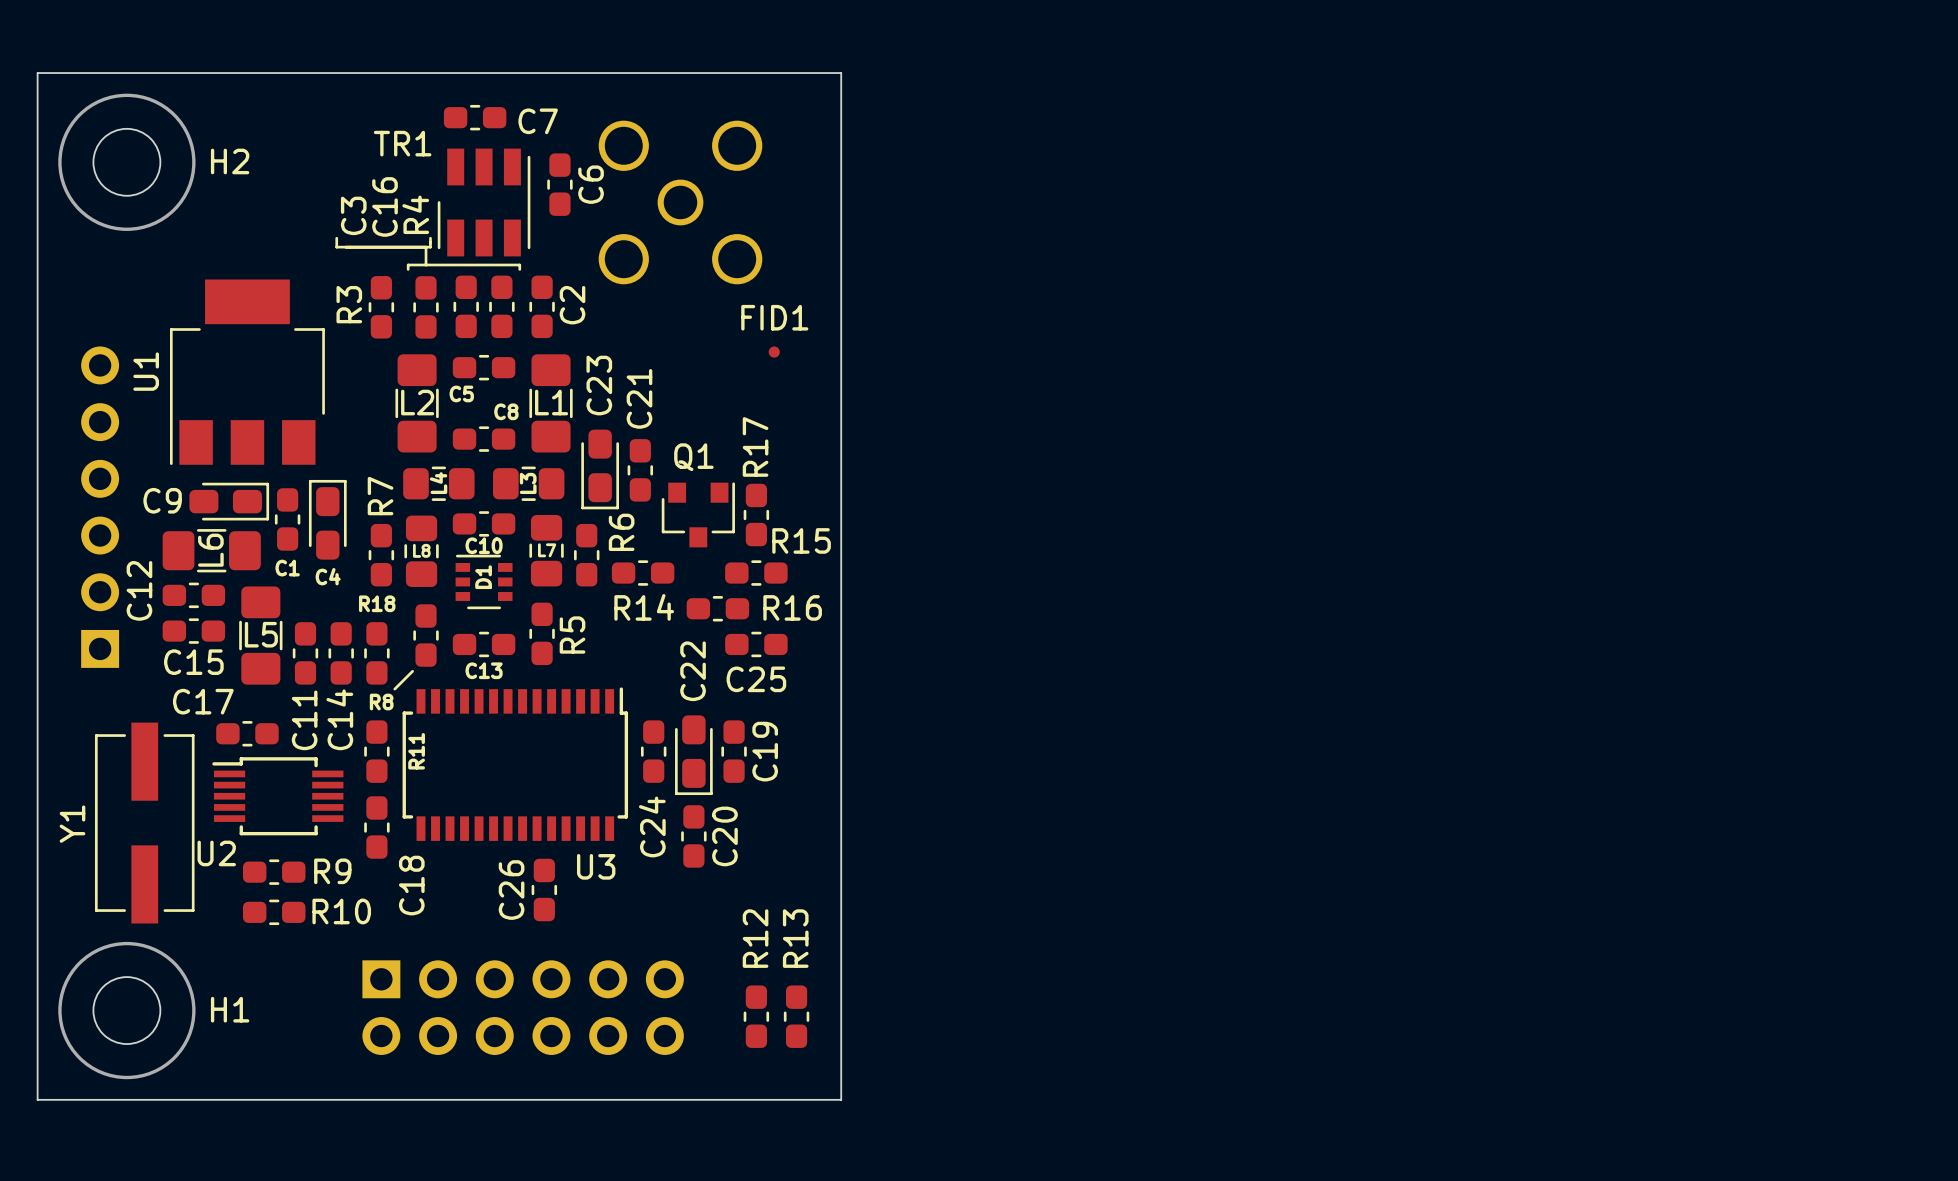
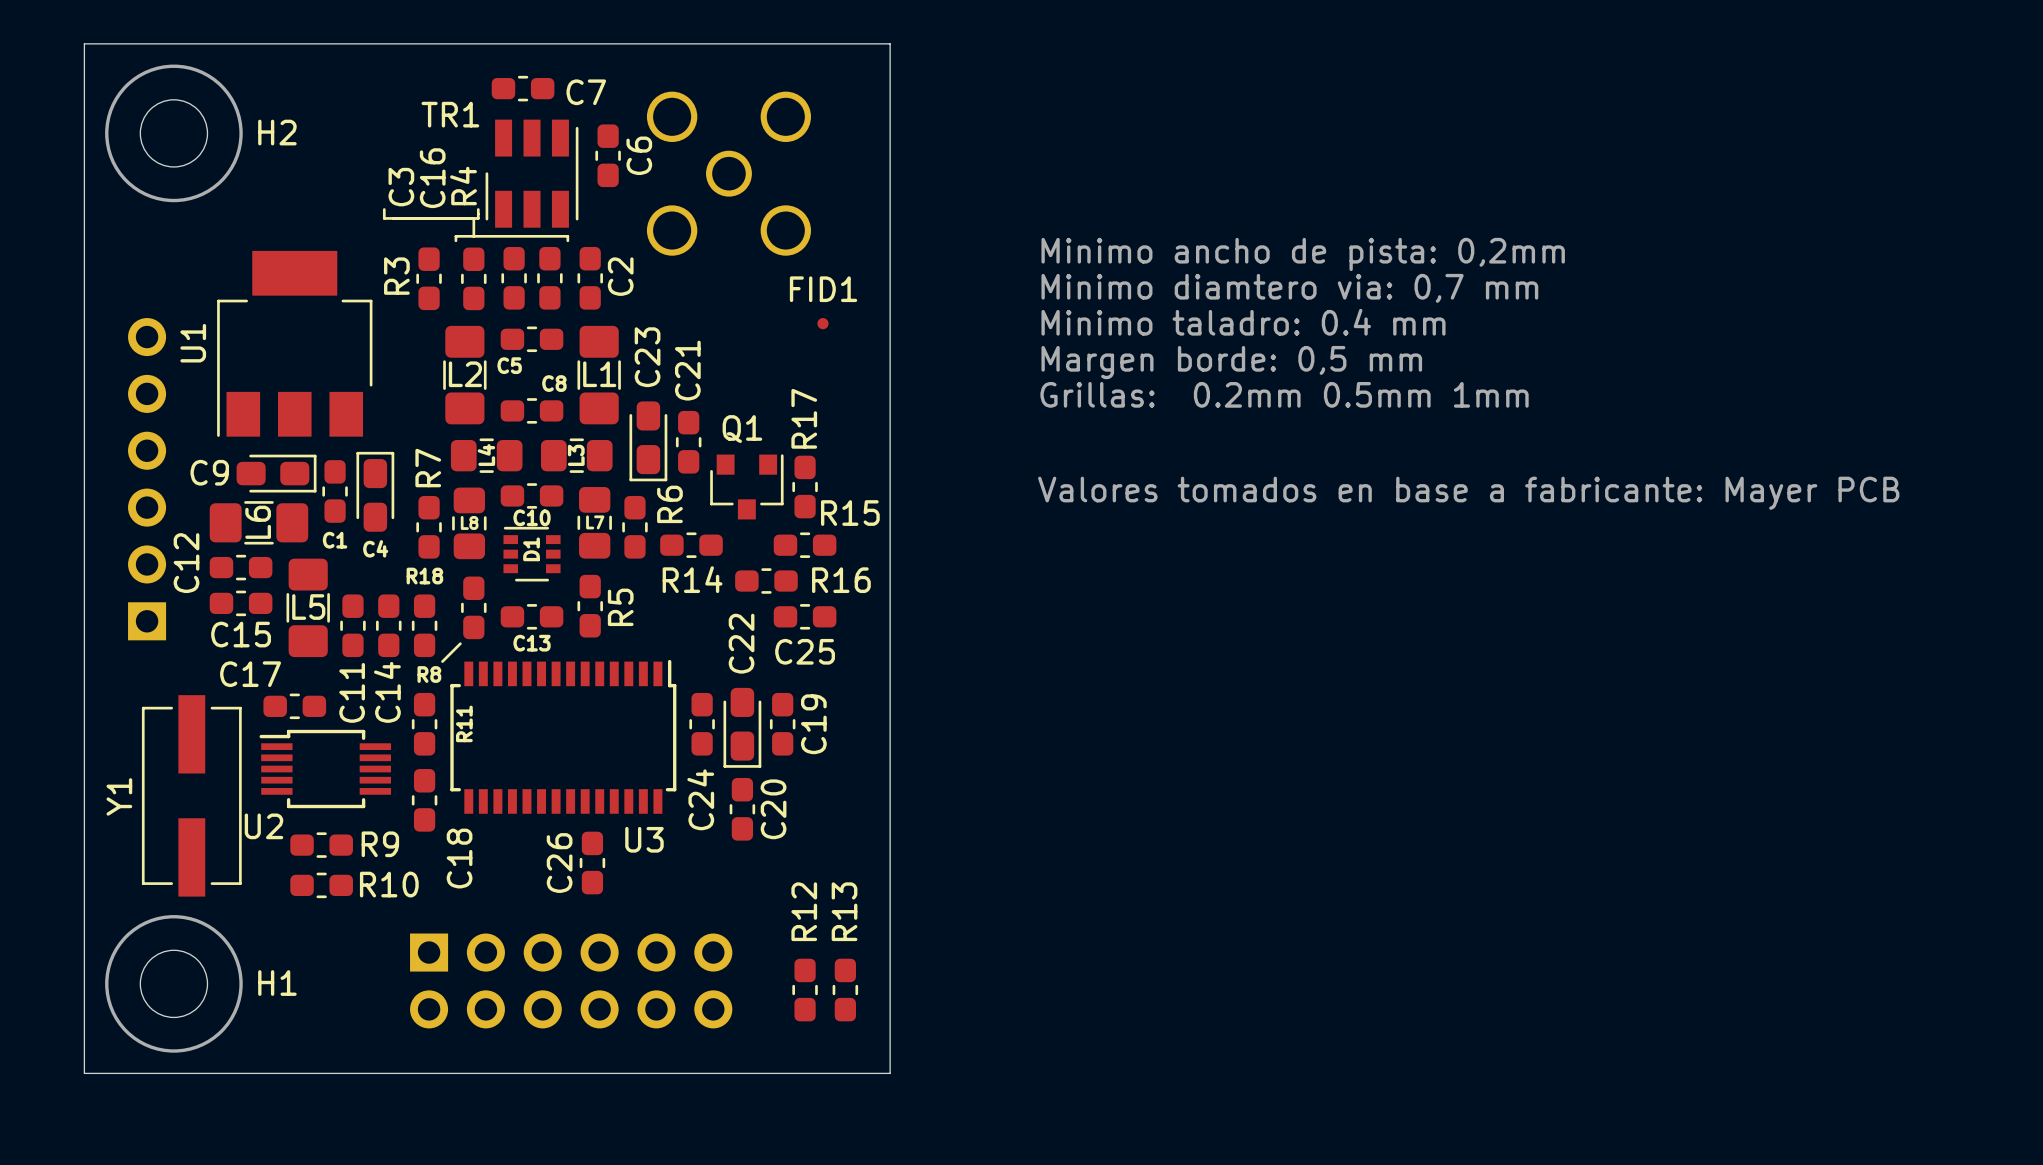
text: none -> Minimo ancho de pista: 0,2mm (1303, 254)
text: none -> Minimo diamtero via: 0,7 mm (1289, 288)
text: none -> Minimo taladro: 0.4 mm (1243, 322)
text: none -> Margen borde: 0,5 mm (1231, 362)
text: none -> Grillas: 0.2mm 0.5mm 1mm (1284, 394)
text: none -> Valores tomados en base a fabricante: Mayer PCB (1468, 493)

